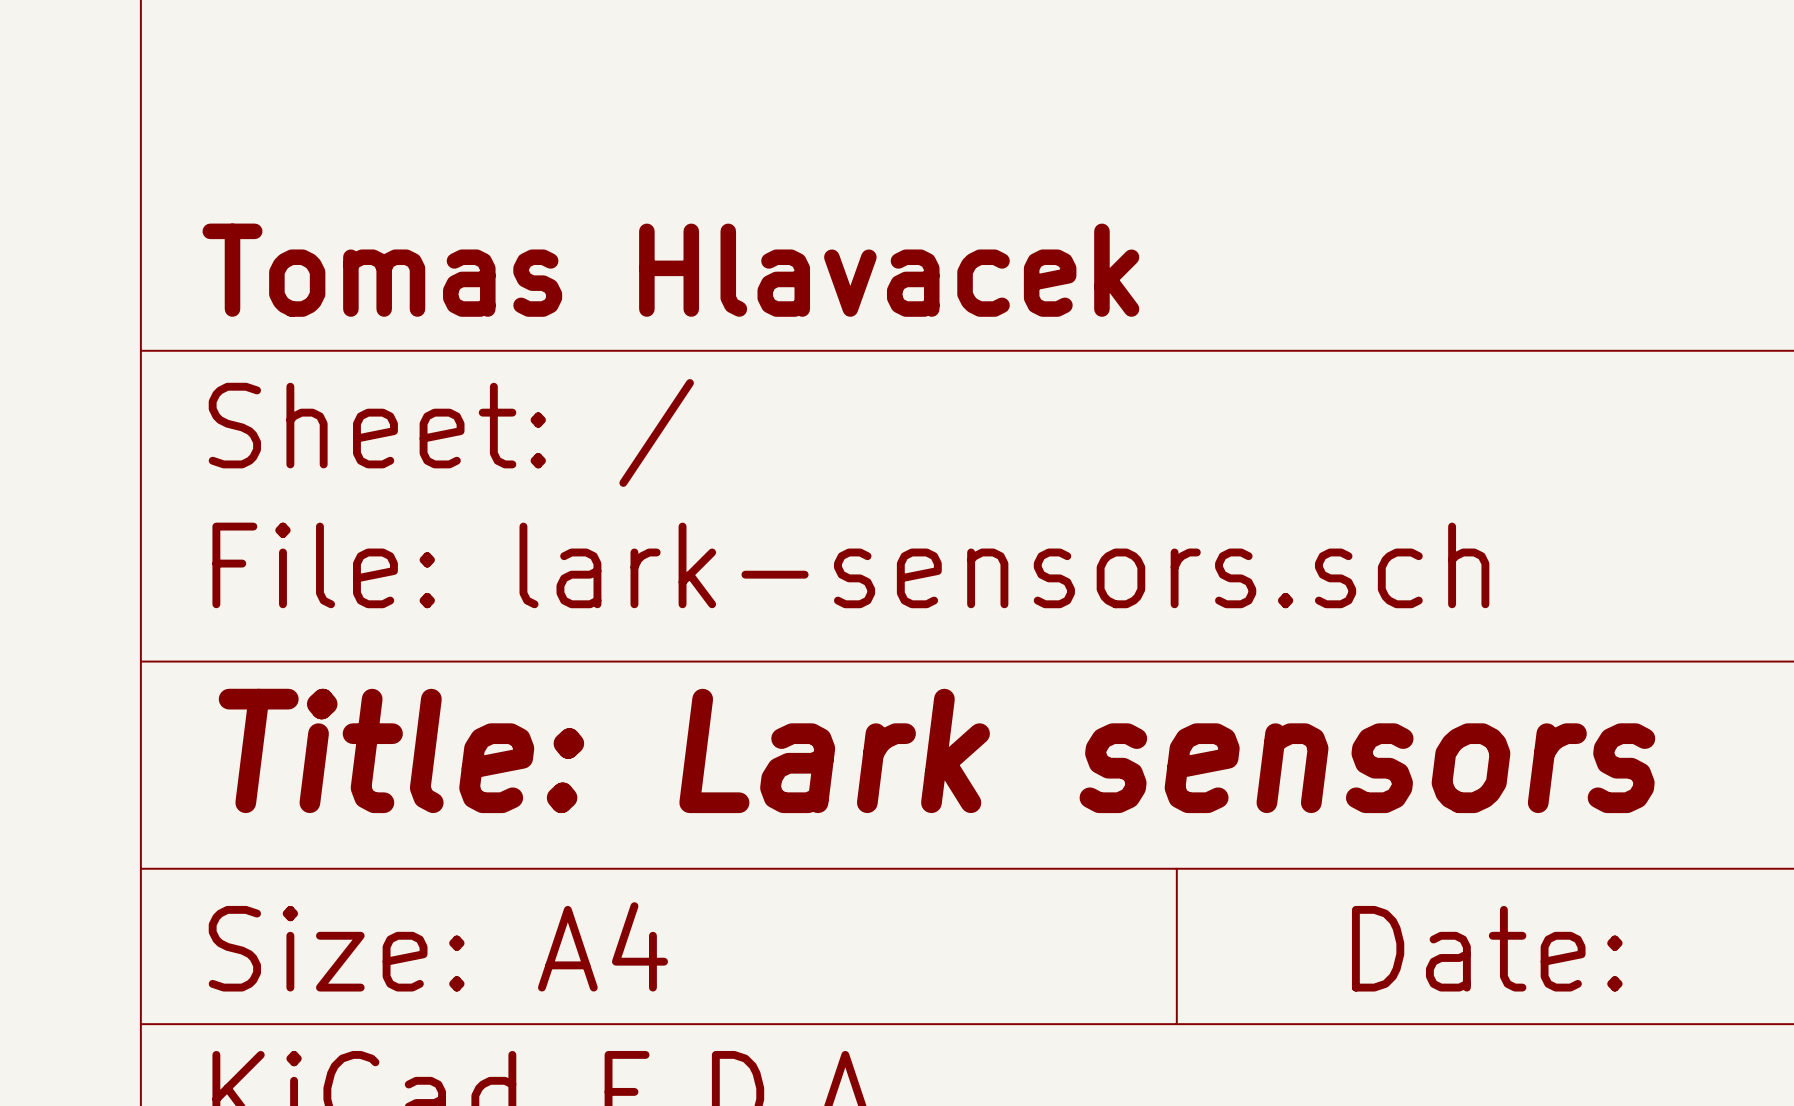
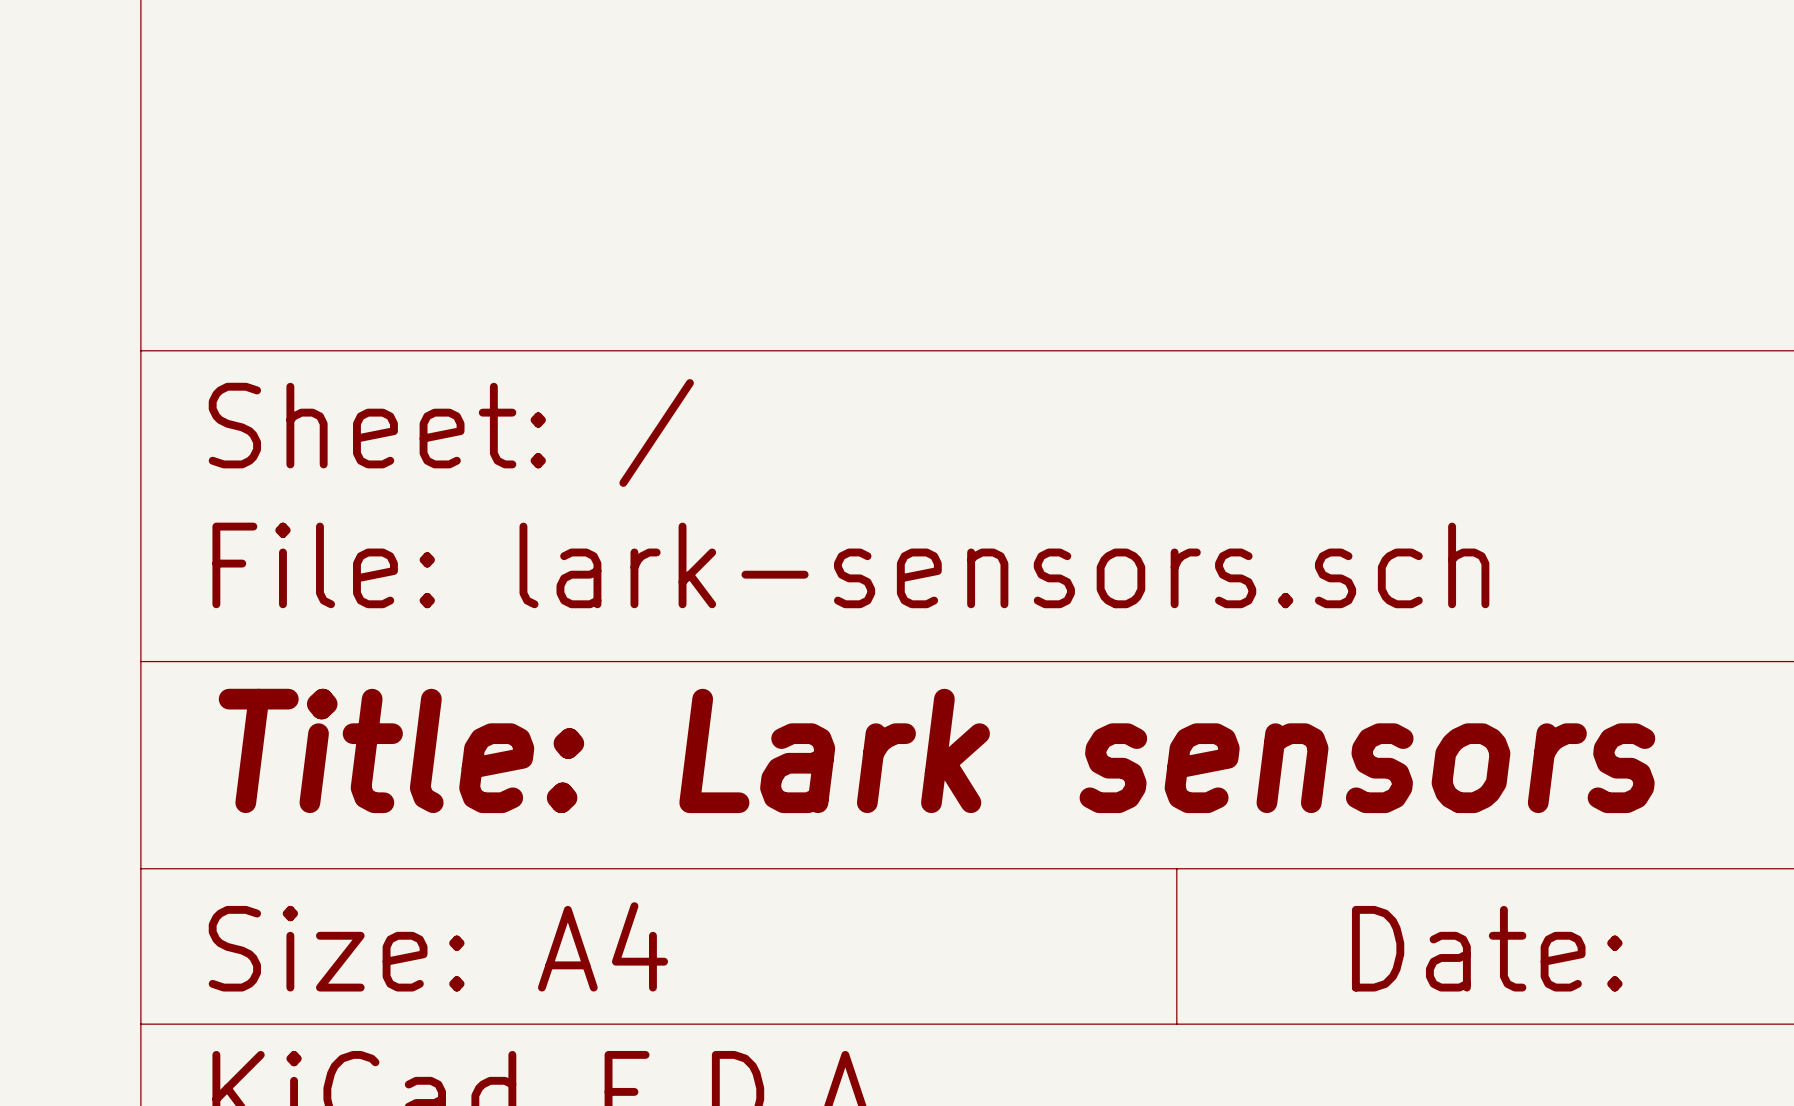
title block: Tomas Hlavacek (670, 270) -> none

